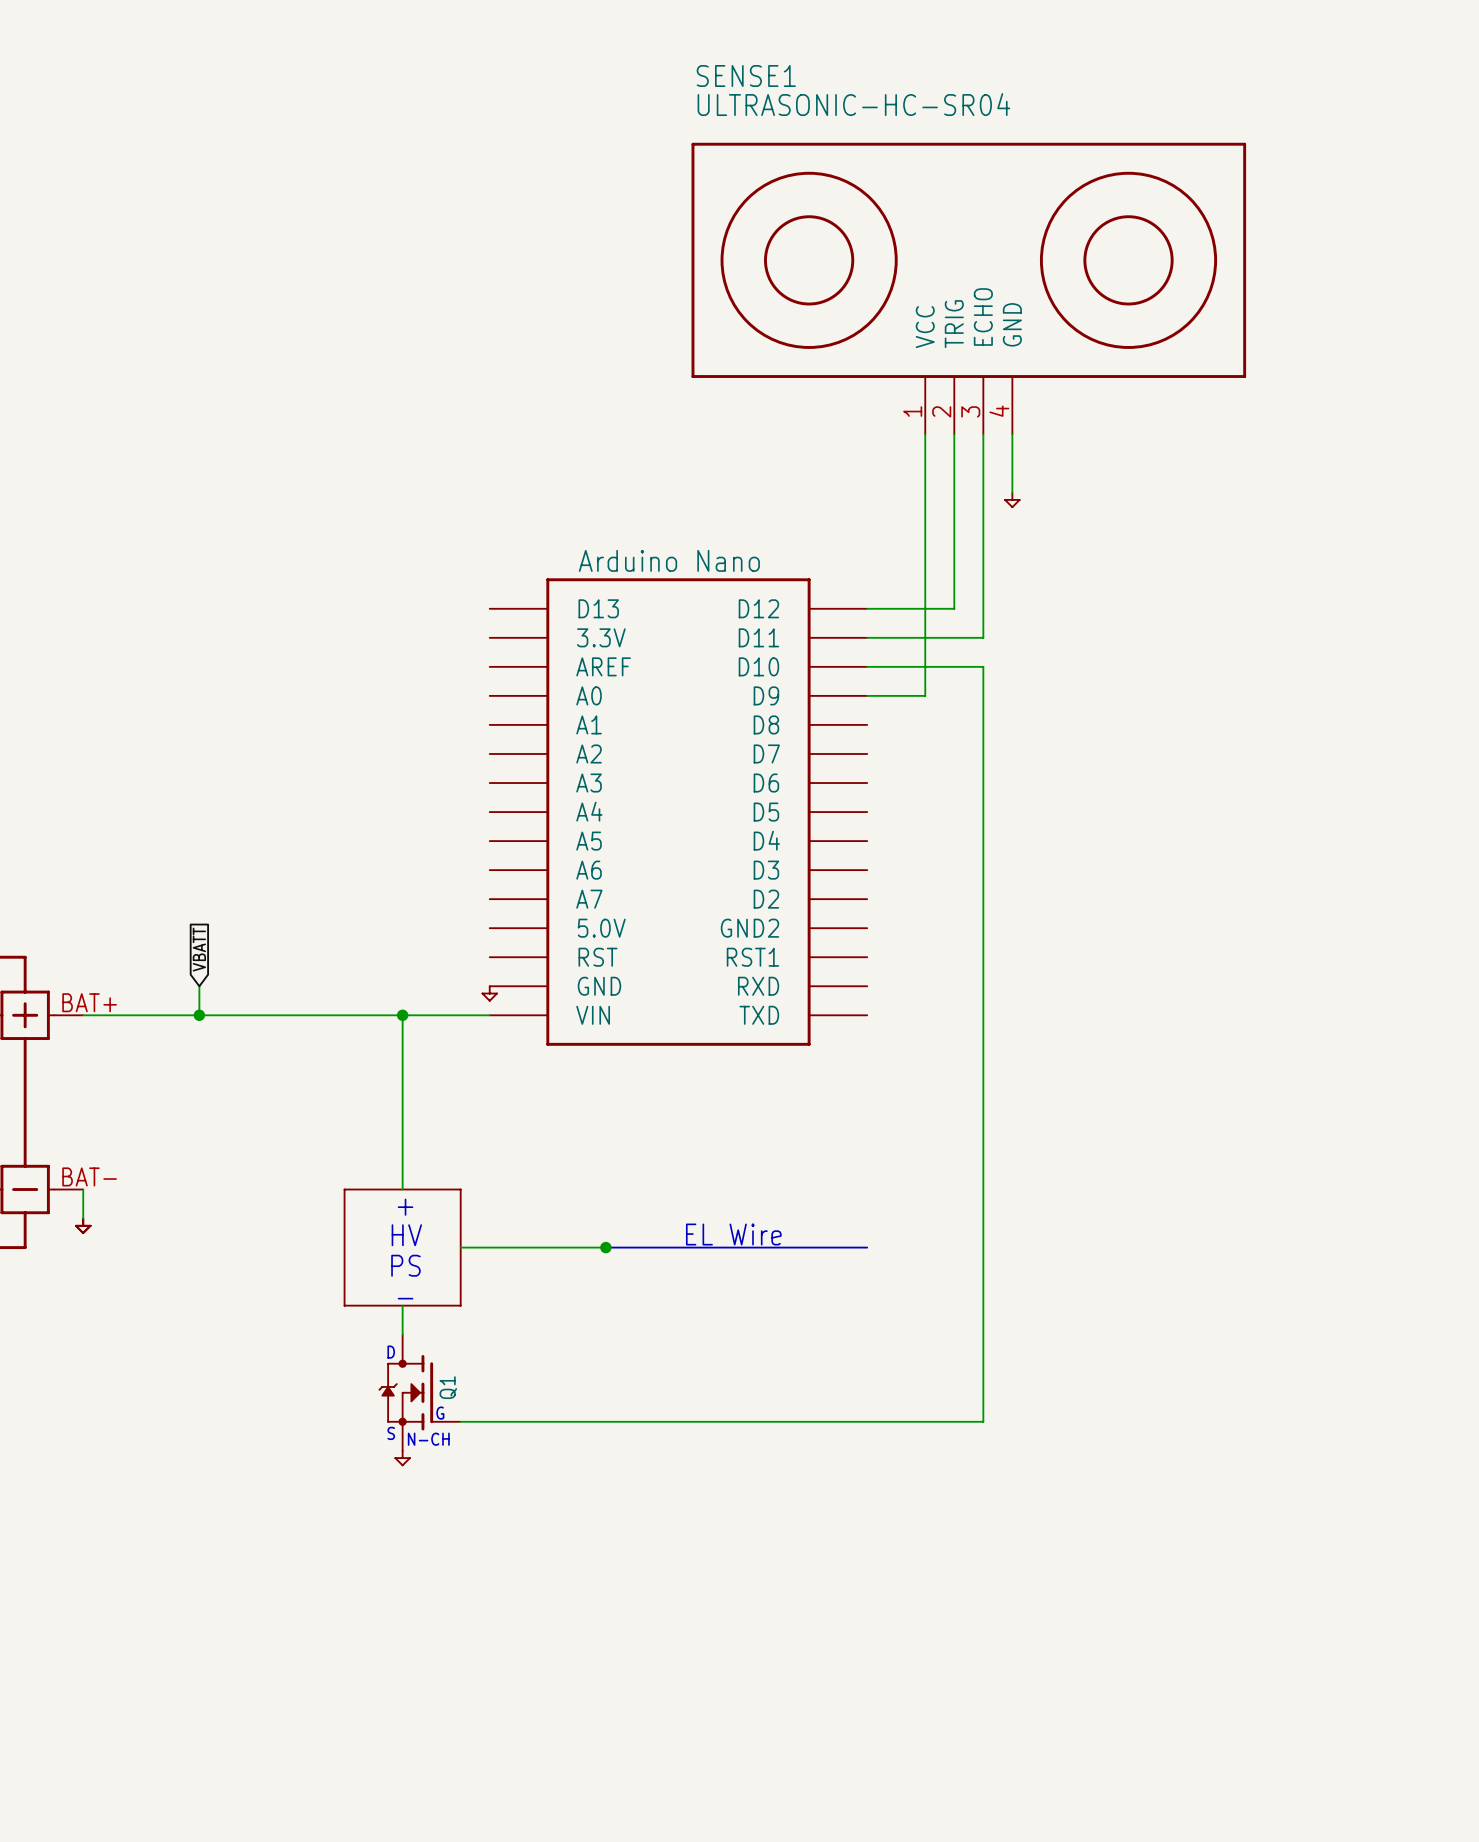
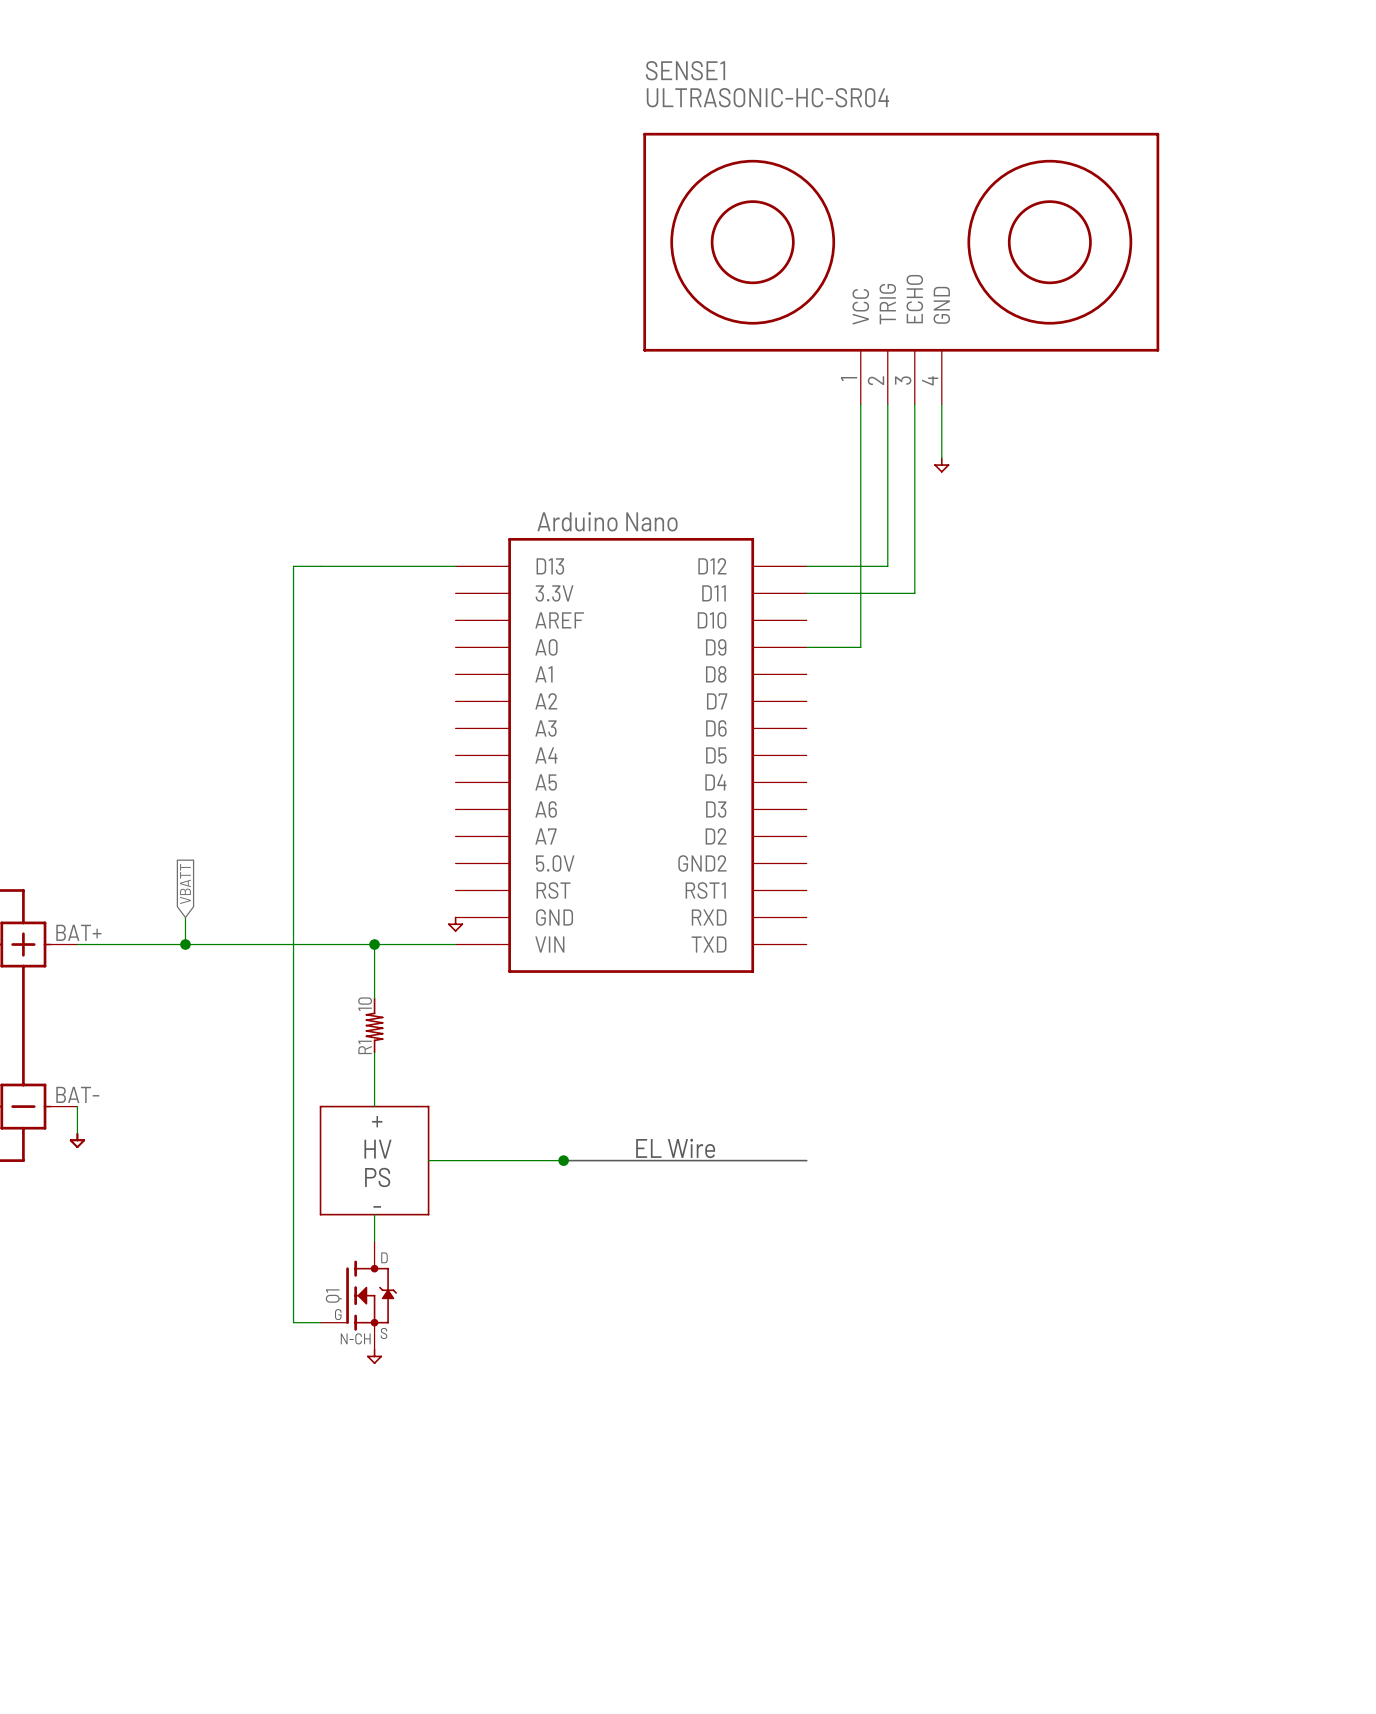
wire: none -> (455, 566) (293, 566) (293, 1322) (320, 1322)
wire: (867, 666) (983, 666) (983, 1421) (460, 1421) -> none
R1: none -> 10 (374, 1025)
Q1 flip: as is (405, 1392) -> left-right (371, 1295)

